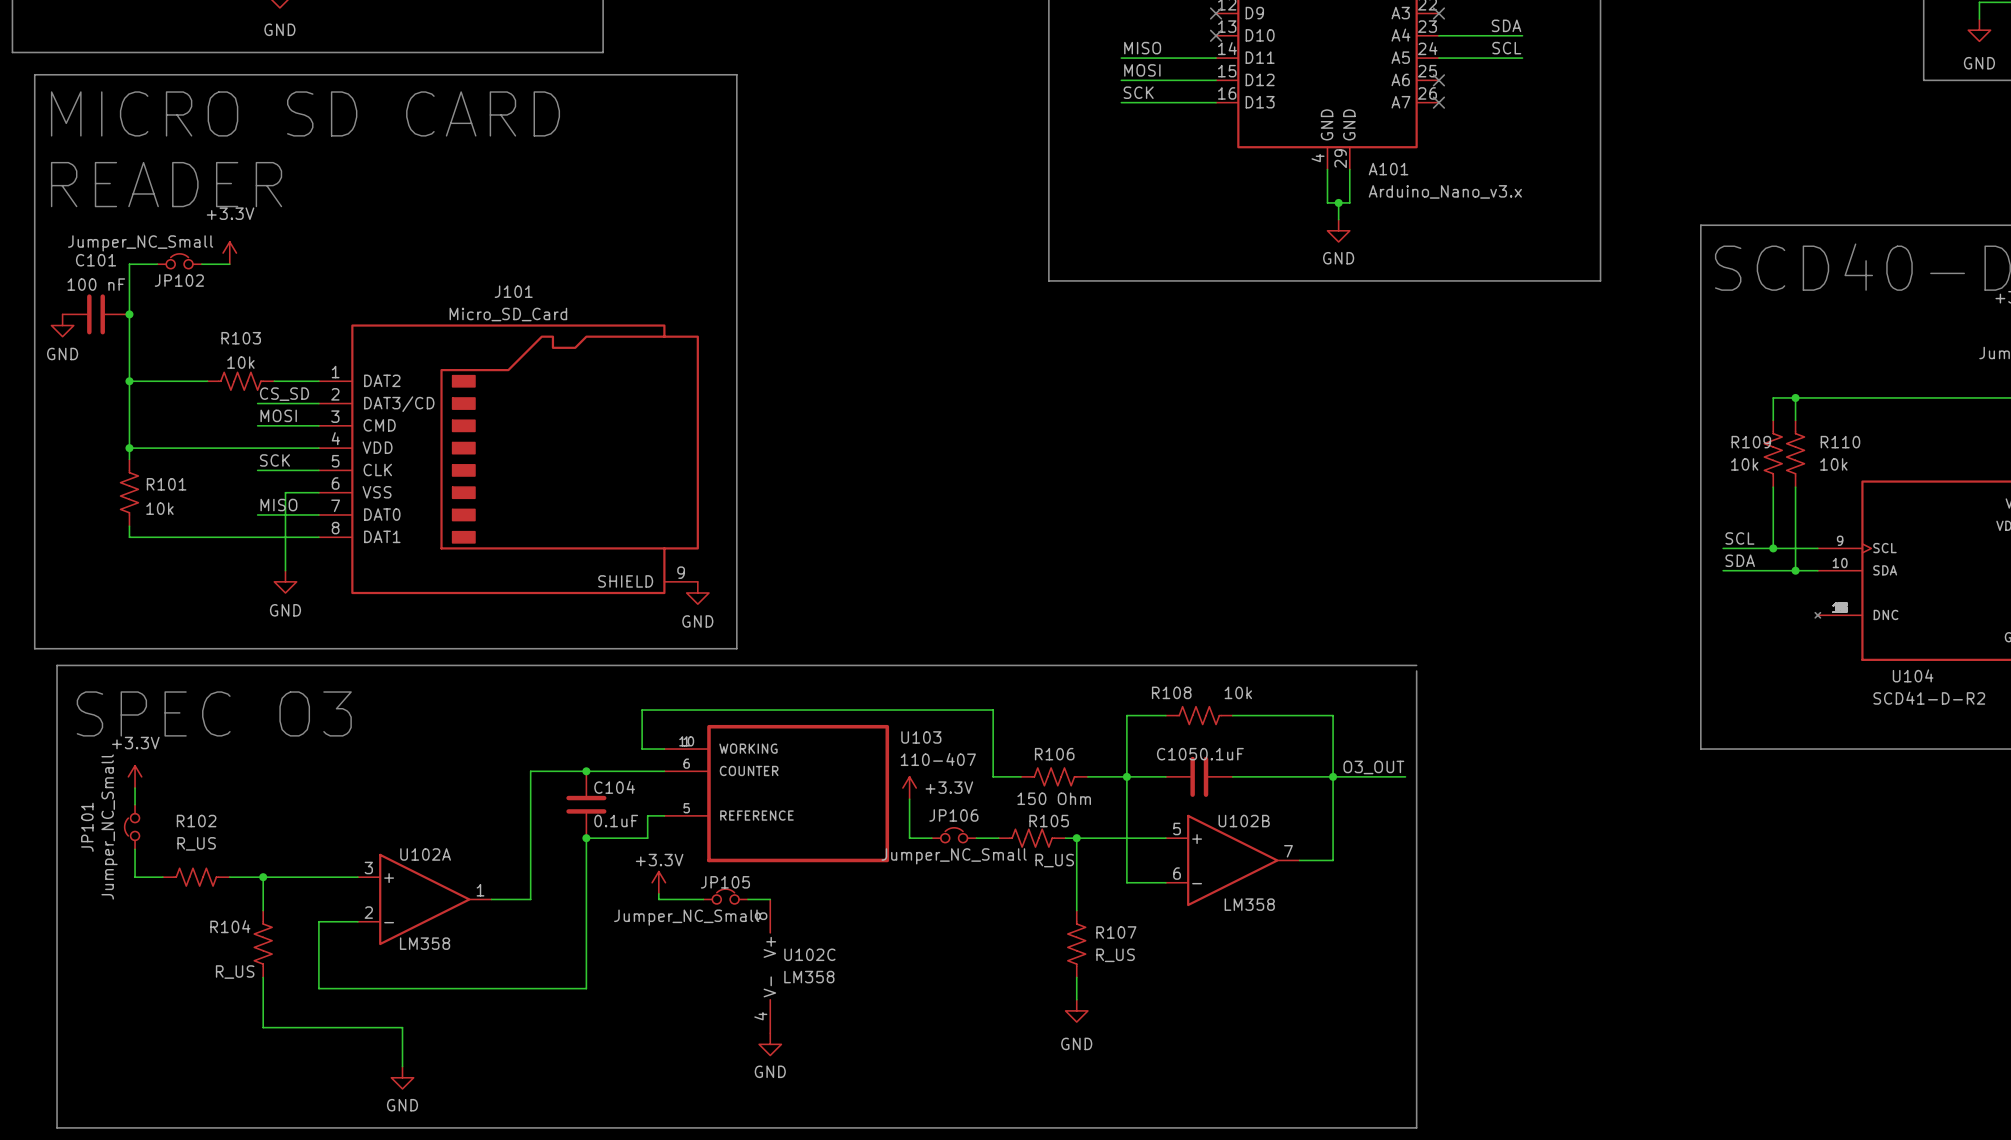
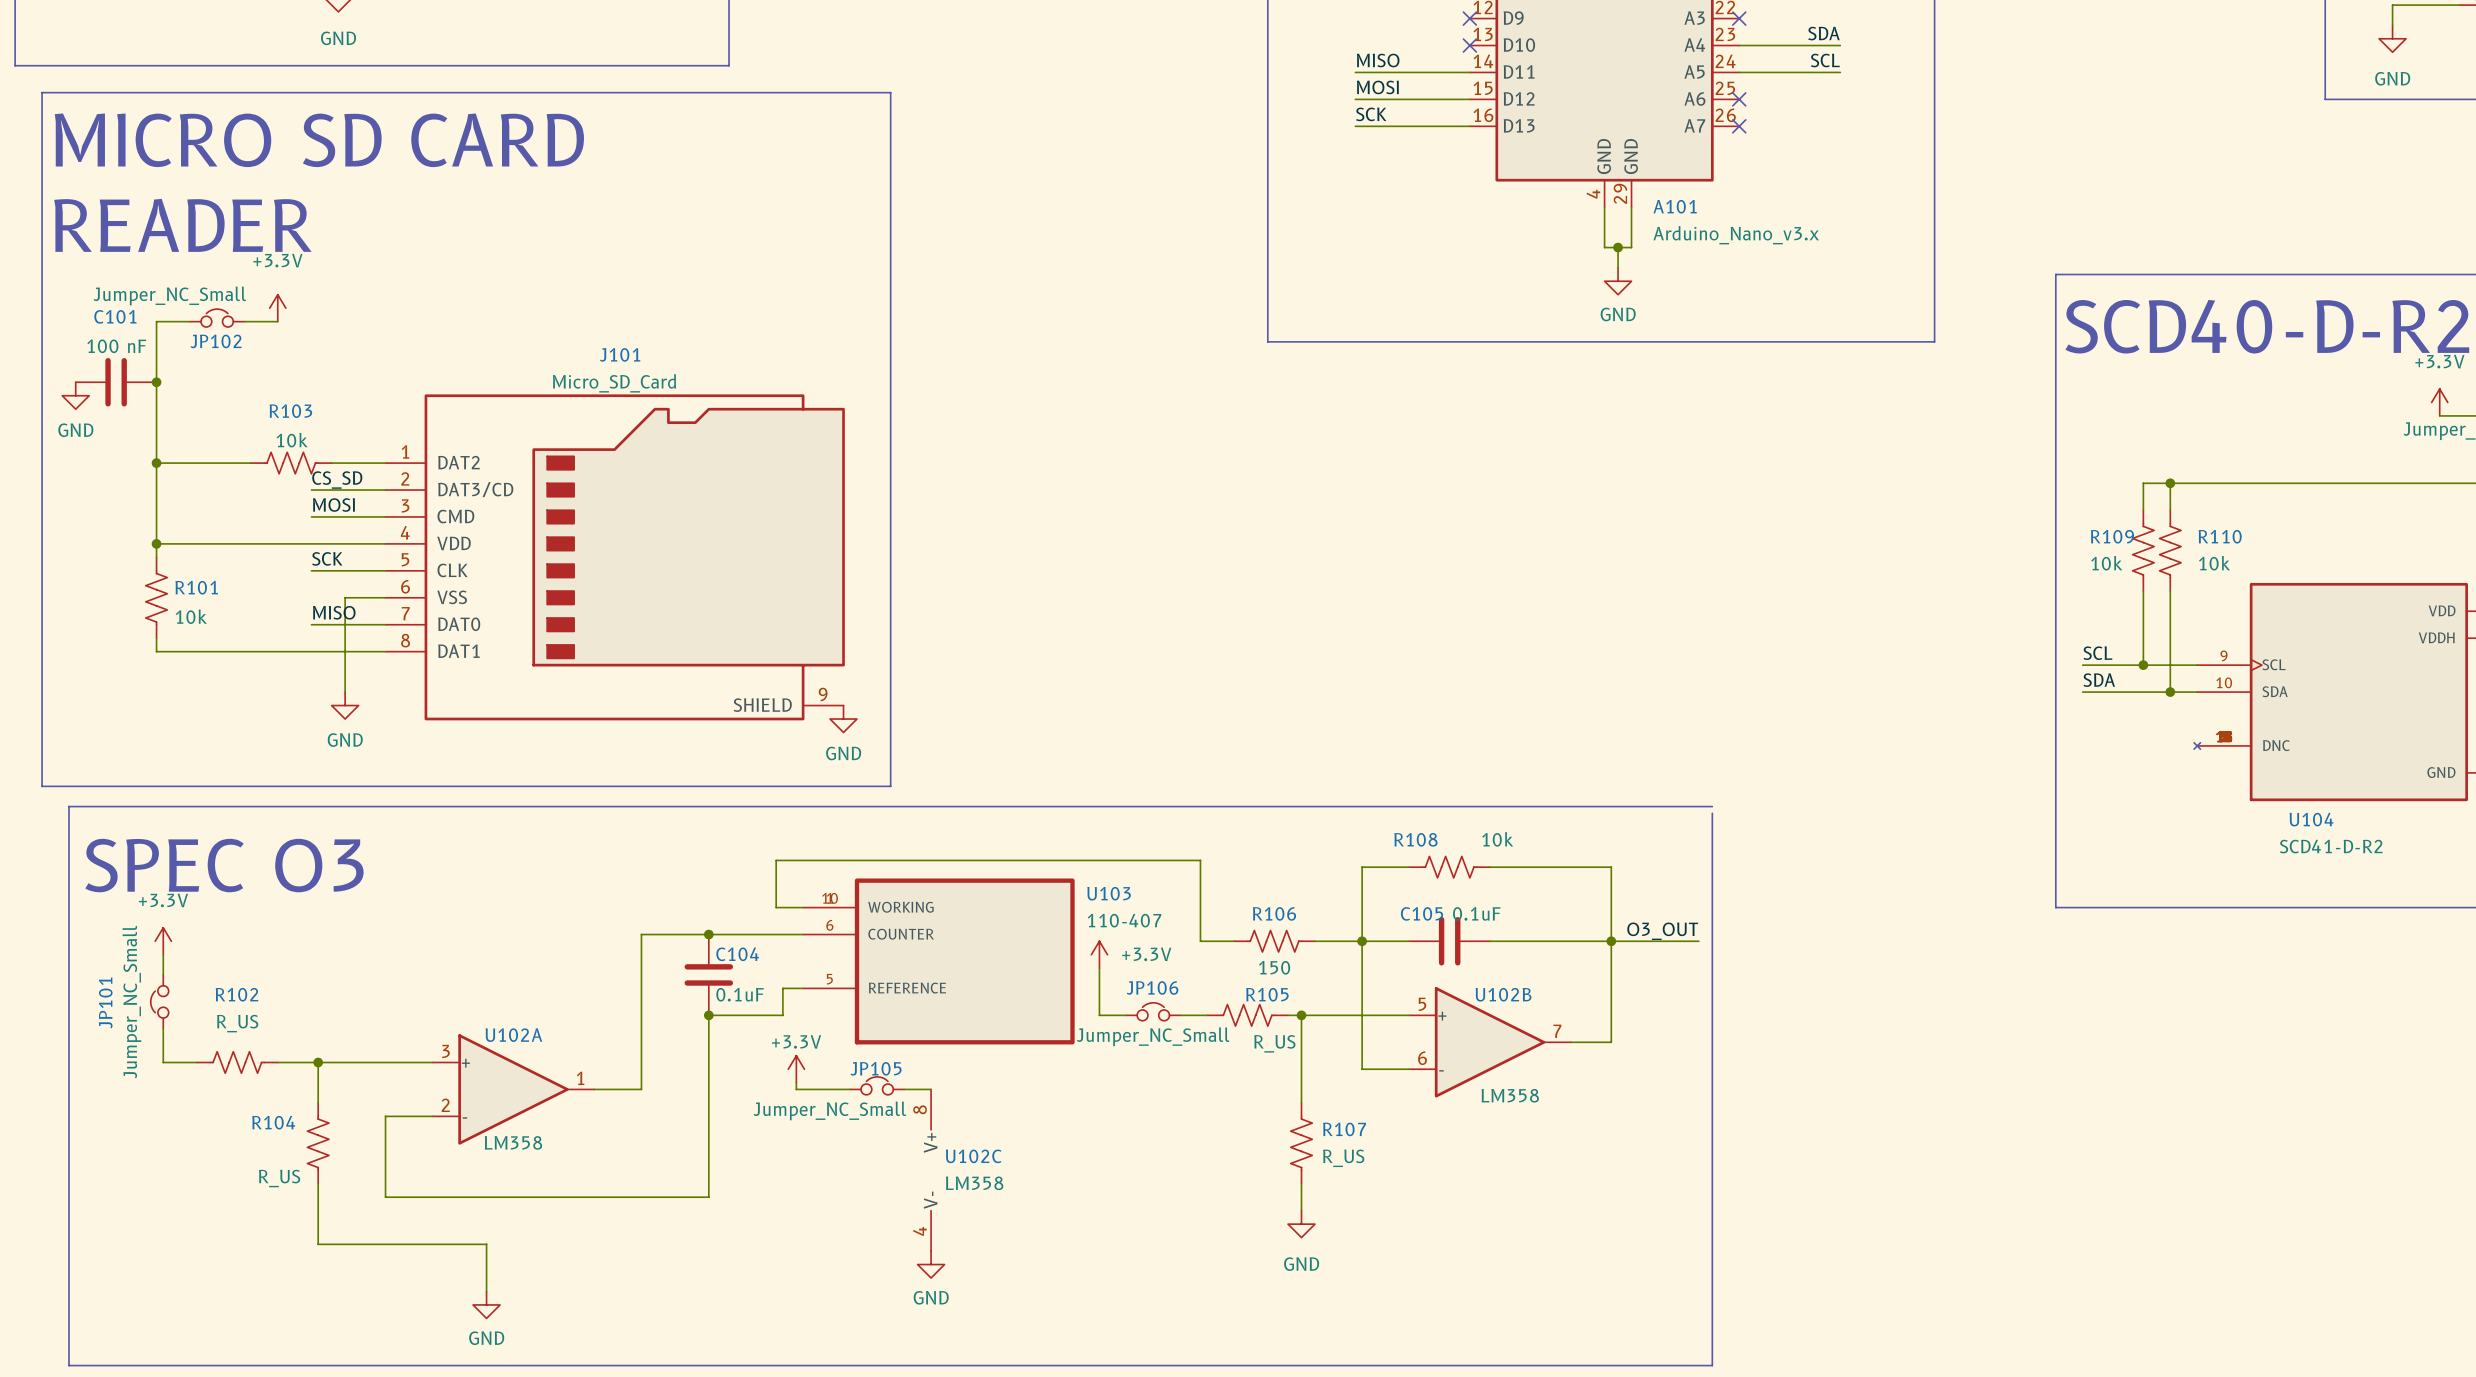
R106 value: 150 Ohm (1054, 798) -> 150 (1274, 967)

